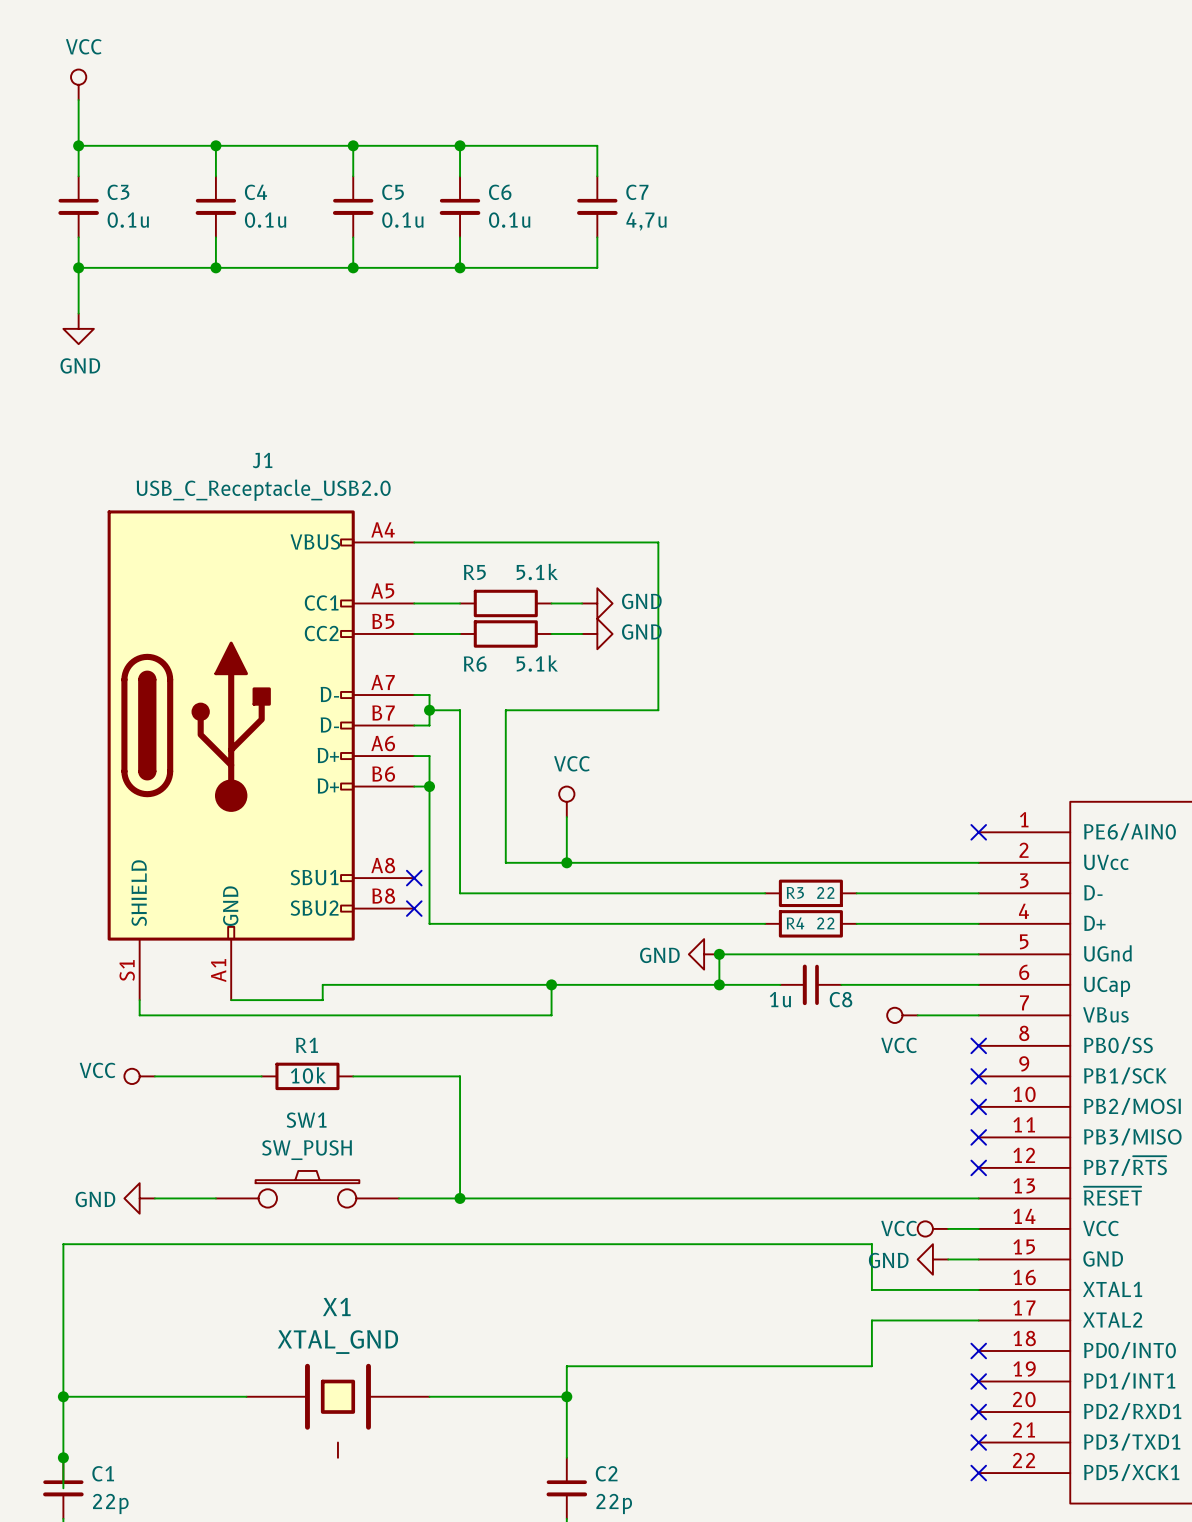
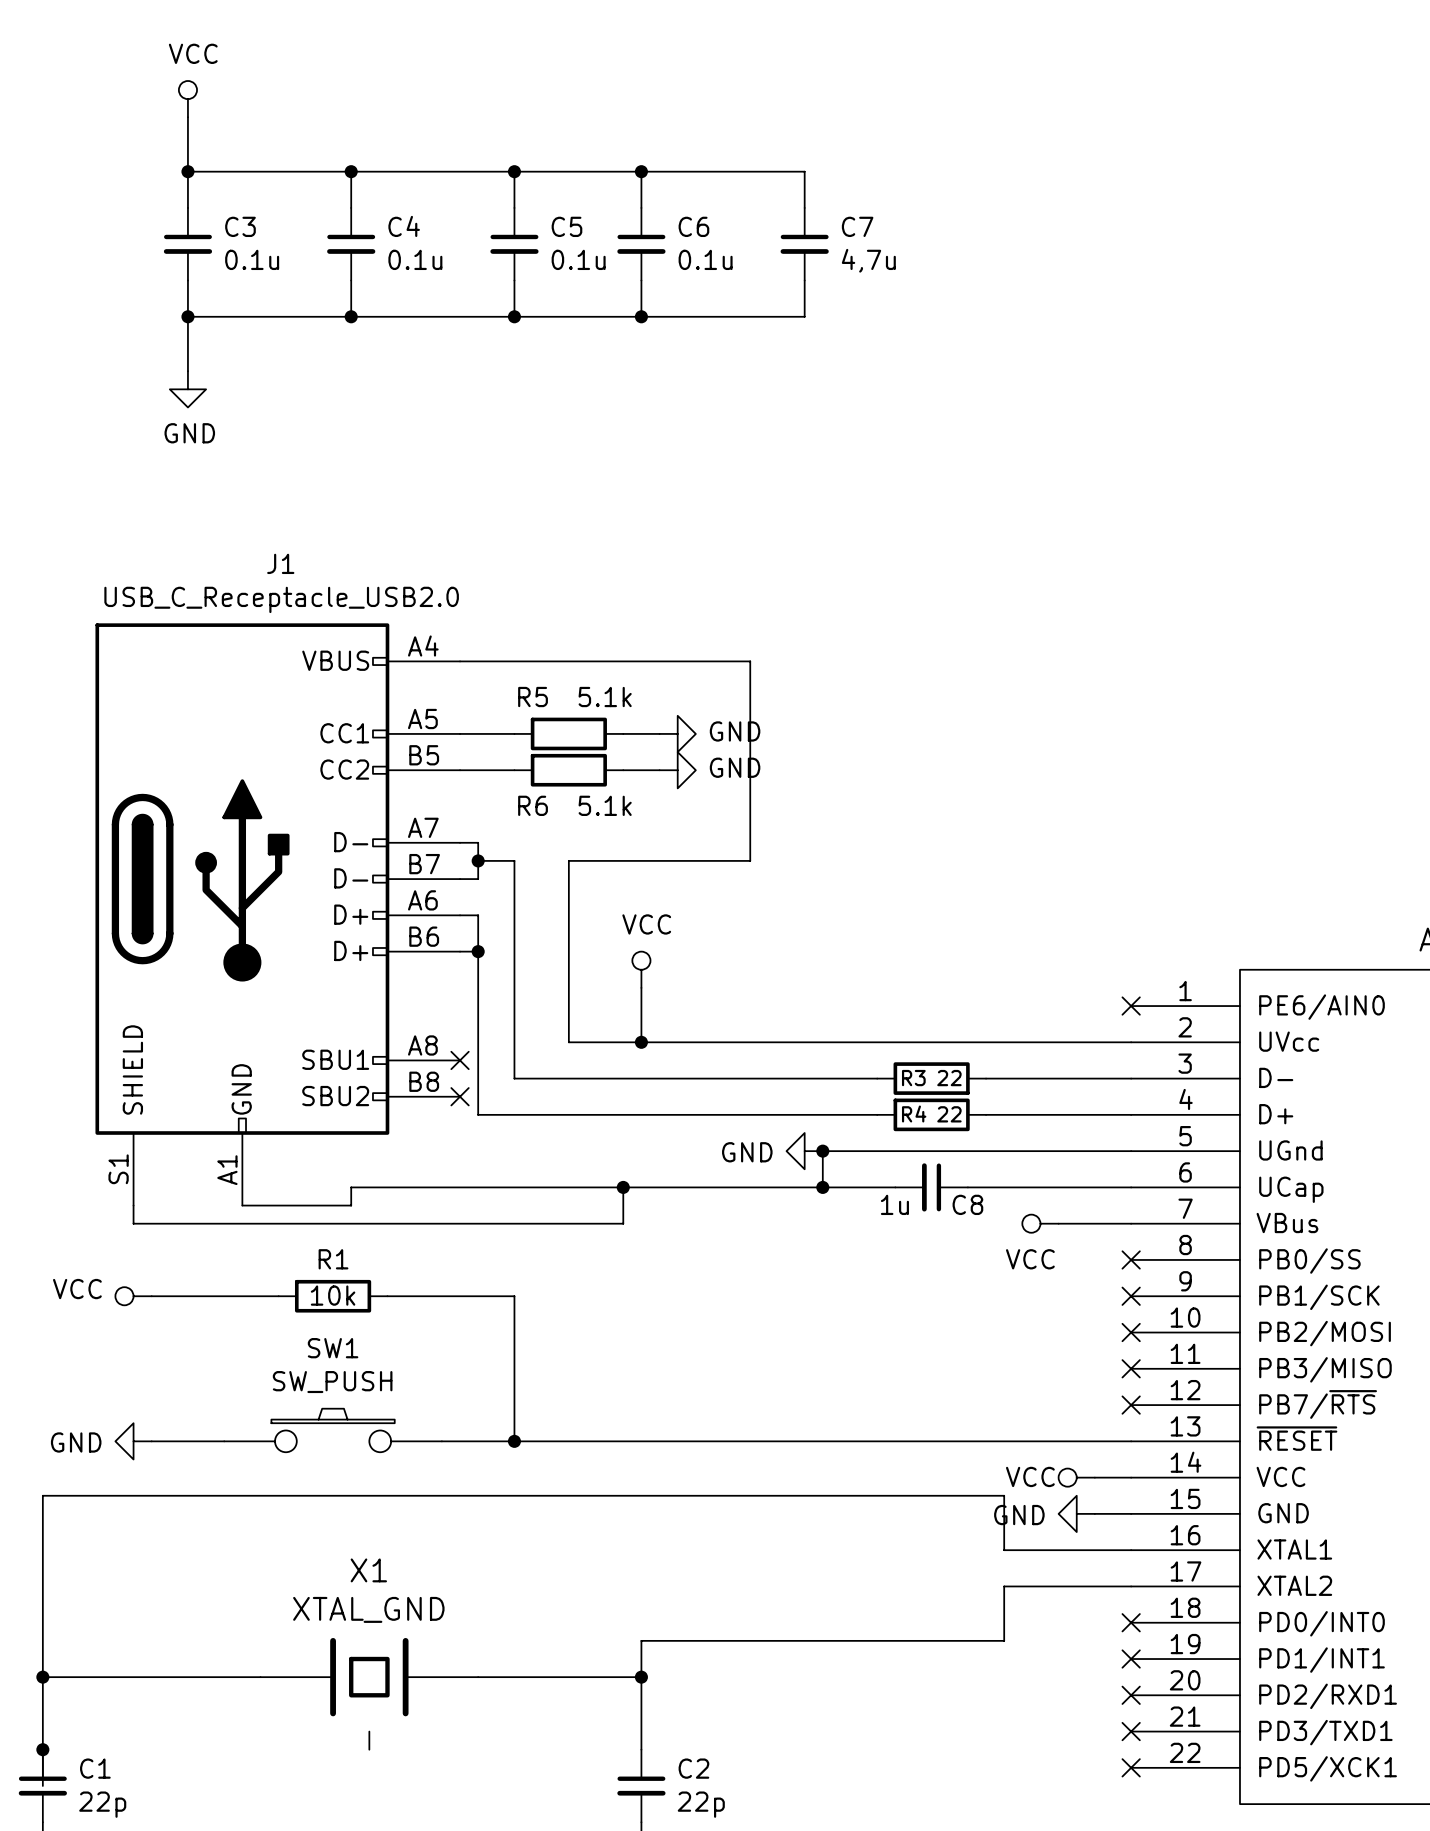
power symbol position: VCC (78, 84) -> VCC (187, 99)
wire: (78, 100) (78, 176) -> (187, 117) (187, 207)
junction: none -> (641, 171)
wire: (78, 145) (597, 145) (597, 176) -> (187, 171) (804, 171) (804, 207)
junction: (78, 145) -> none
wire: (215, 145) (215, 176) -> (351, 171) (351, 207)
junction position: (215, 145) -> (187, 171)
wire: (353, 145) (353, 176) -> (641, 171) (641, 207)
junction position: (353, 145) -> (351, 171)
junction position: (460, 145) -> (514, 171)
C3 position: (78, 206) -> (187, 244)
C4 position: (215, 206) -> (351, 244)
C5 position: (353, 206) -> (514, 244)
C6 position: (460, 206) -> (641, 244)
C7 position: (597, 206) -> (804, 244)
wire: (78, 237) (78, 313) -> (187, 280) (187, 371)
wire: (215, 237) (215, 267) -> (351, 280) (351, 316)
wire: (353, 237) (353, 267) -> (641, 280) (641, 316)
wire: (597, 237) (597, 267) (78, 267) -> (804, 280) (804, 316) (187, 316)
junction: none -> (641, 316)
junction: (78, 267) -> none
junction position: (215, 267) -> (187, 316)
junction position: (353, 267) -> (351, 316)
junction position: (460, 267) -> (514, 316)
power symbol position: GND (78, 328) -> GND (187, 389)

